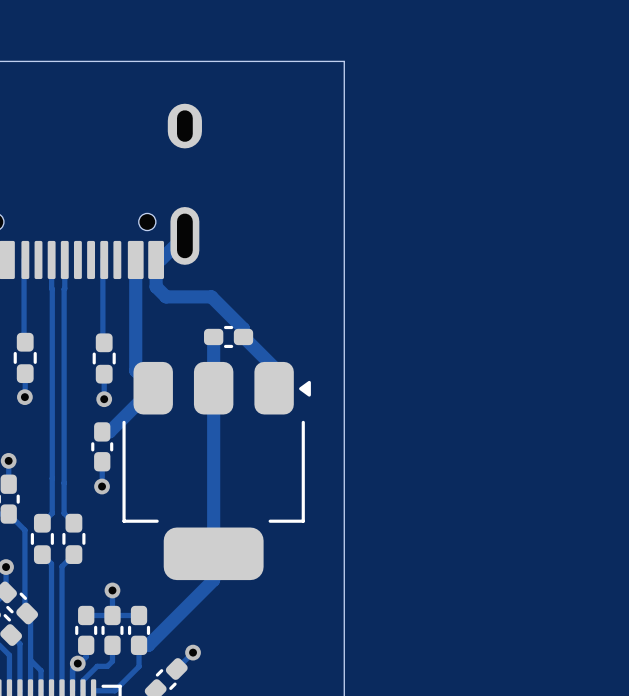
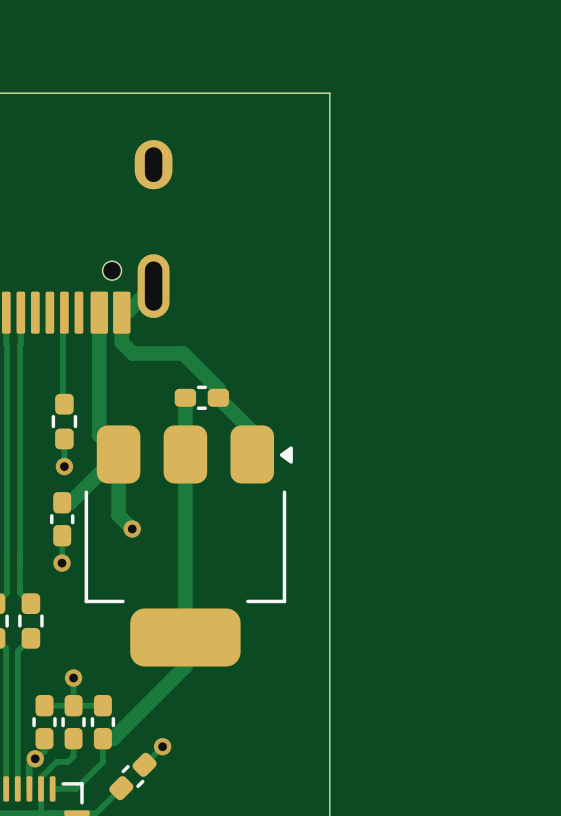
track: none -> (118, 454) (118, 515) (132, 528)
via: none -> (132, 528)

